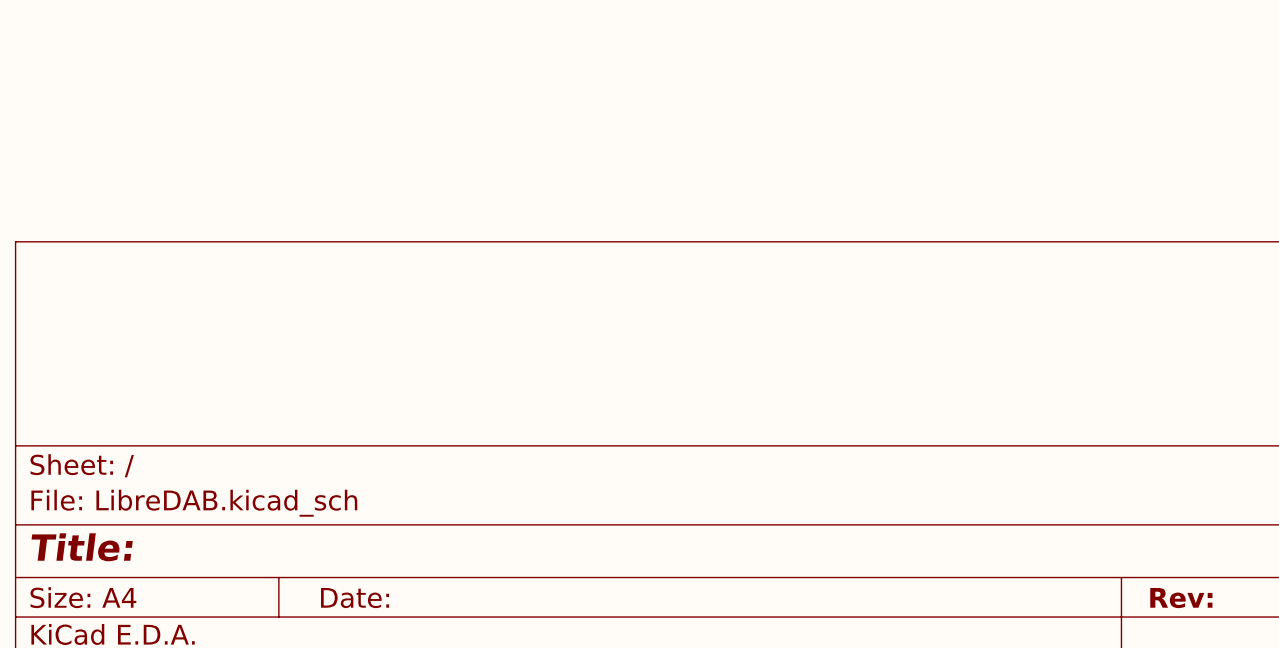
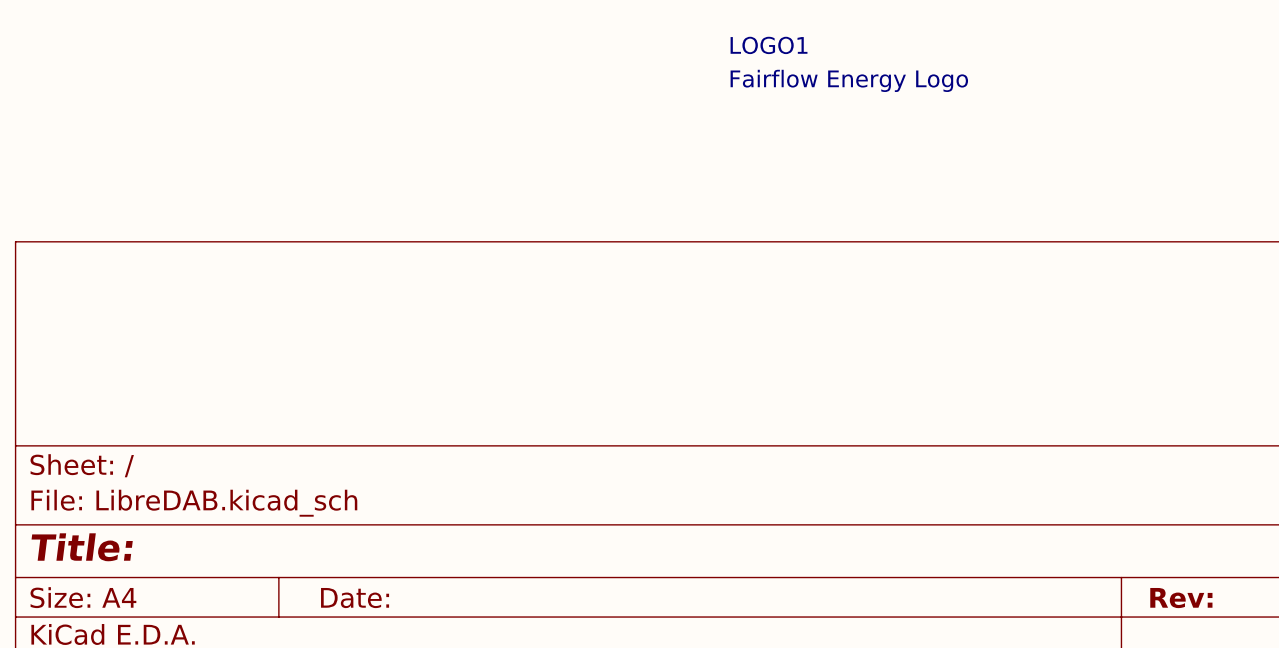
LOGO1: none -> (849, 64)

